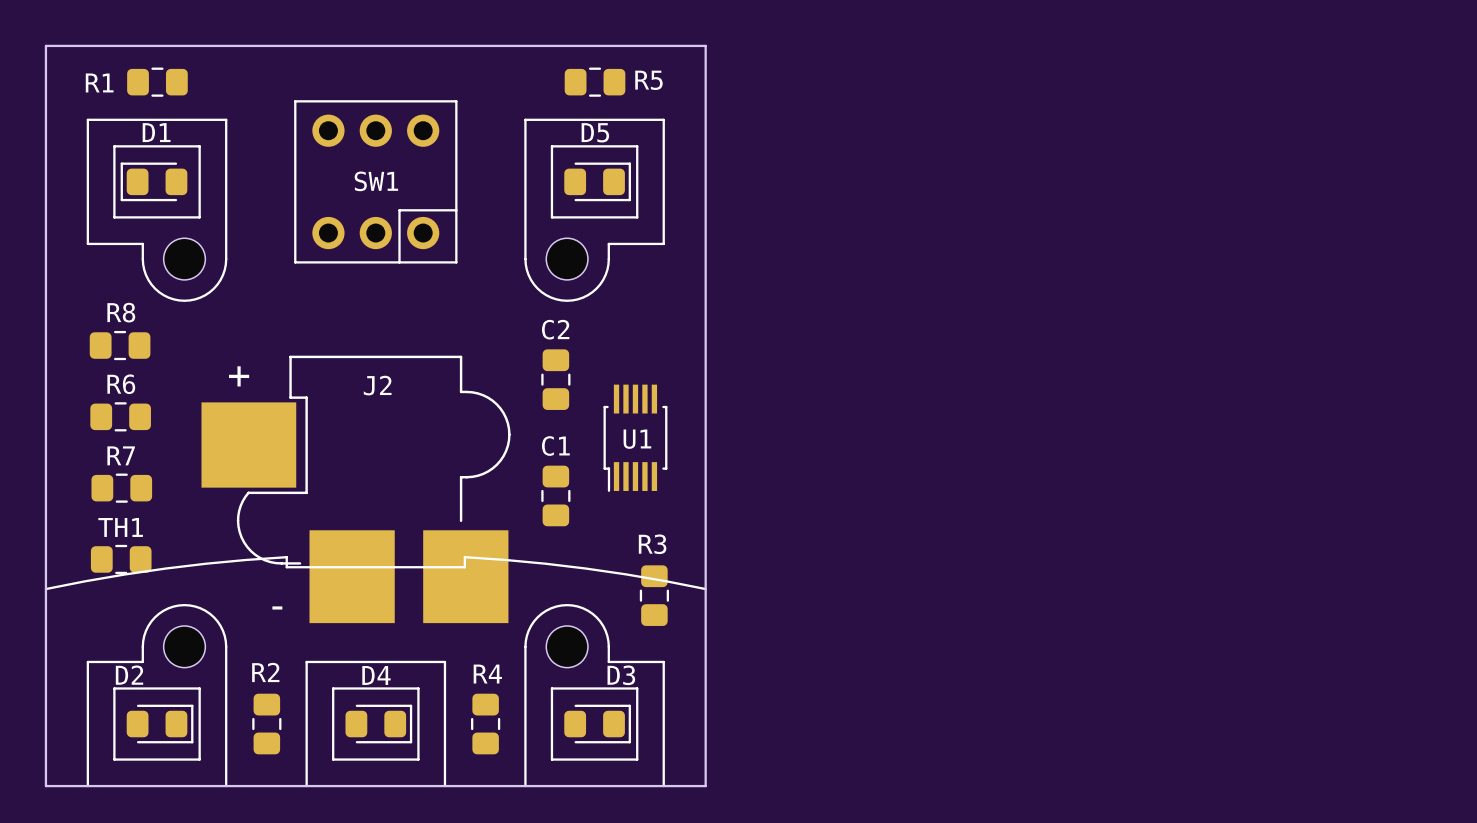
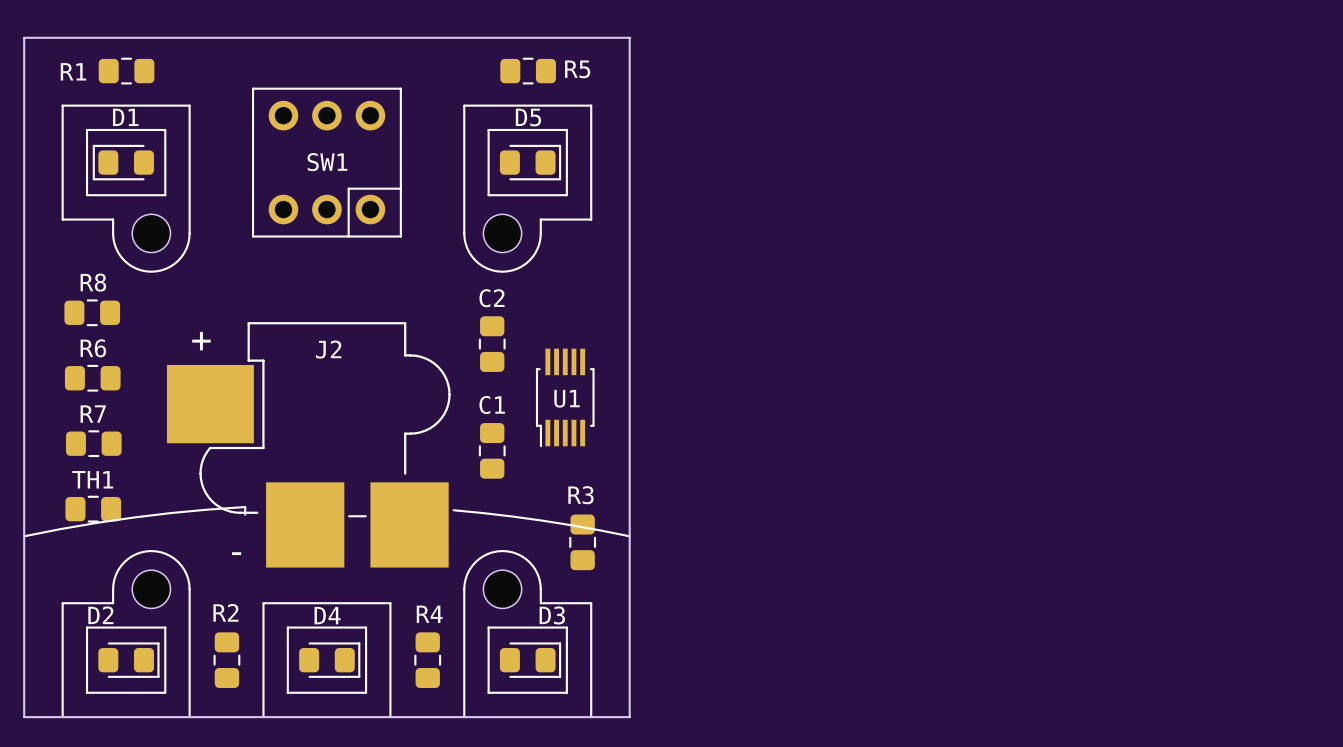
line: (286, 565) (286, 567) (399, 567) -> none
line: (418, 567) (464, 567) (464, 557) (505, 559) (585, 568) (705, 589) -> (453, 510) (542, 520) (629, 536)

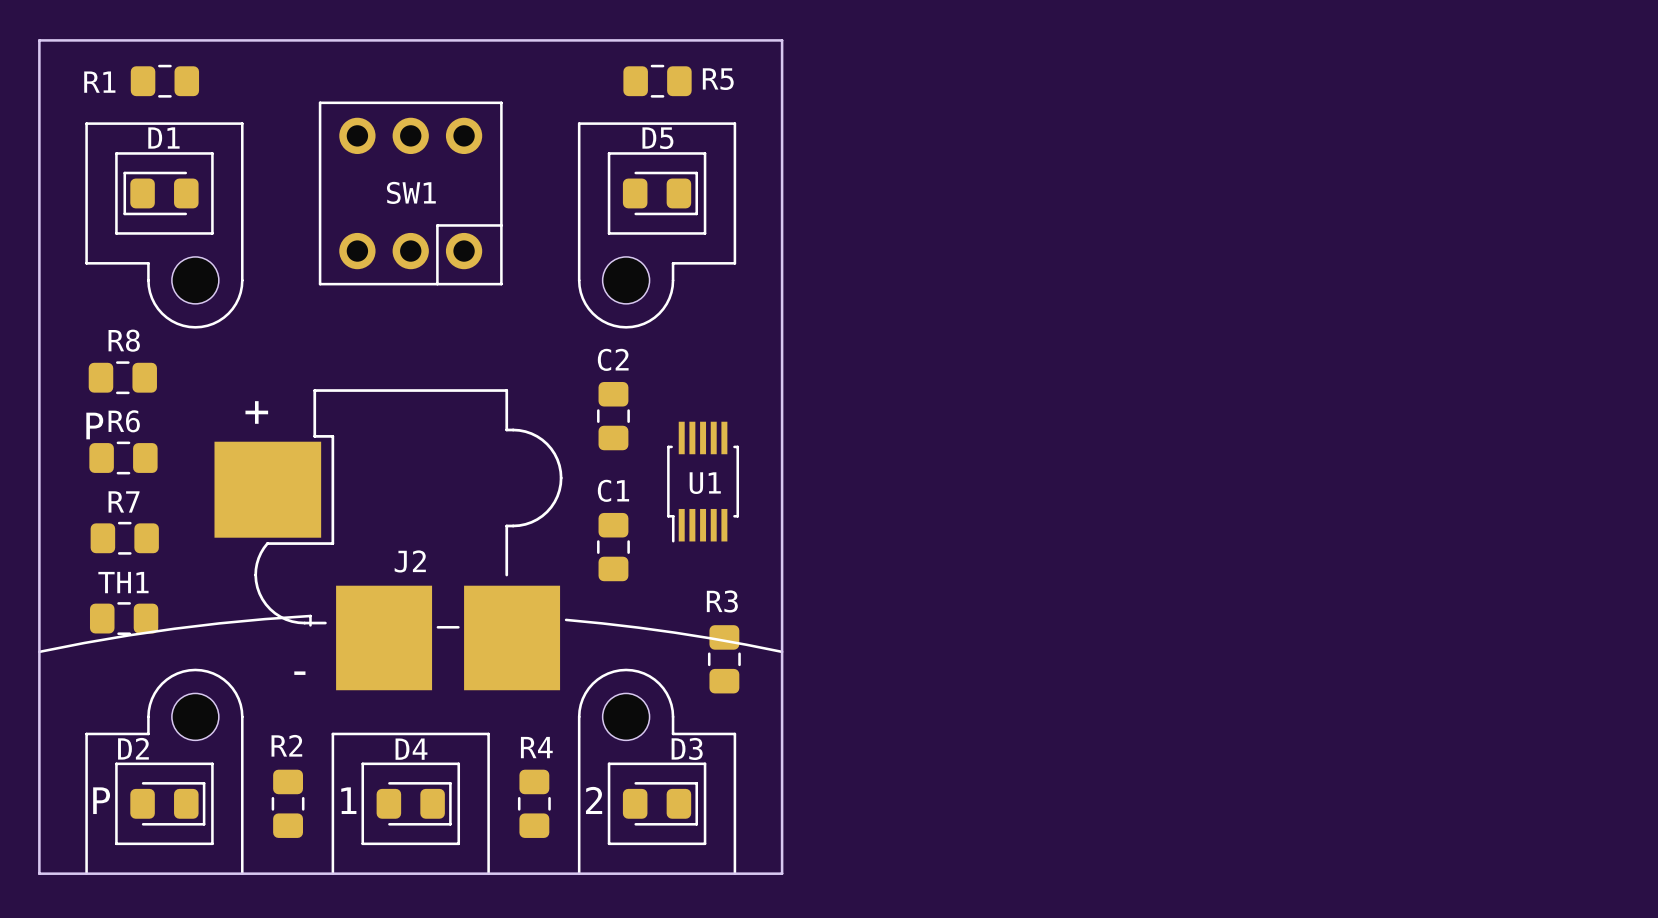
J2 name position: J2 (328, 349) -> J2 (410, 561)
text: none -> P (94, 426)
text: none -> P (101, 800)
text: none -> 1 (348, 800)
text: none -> 2 (594, 800)

